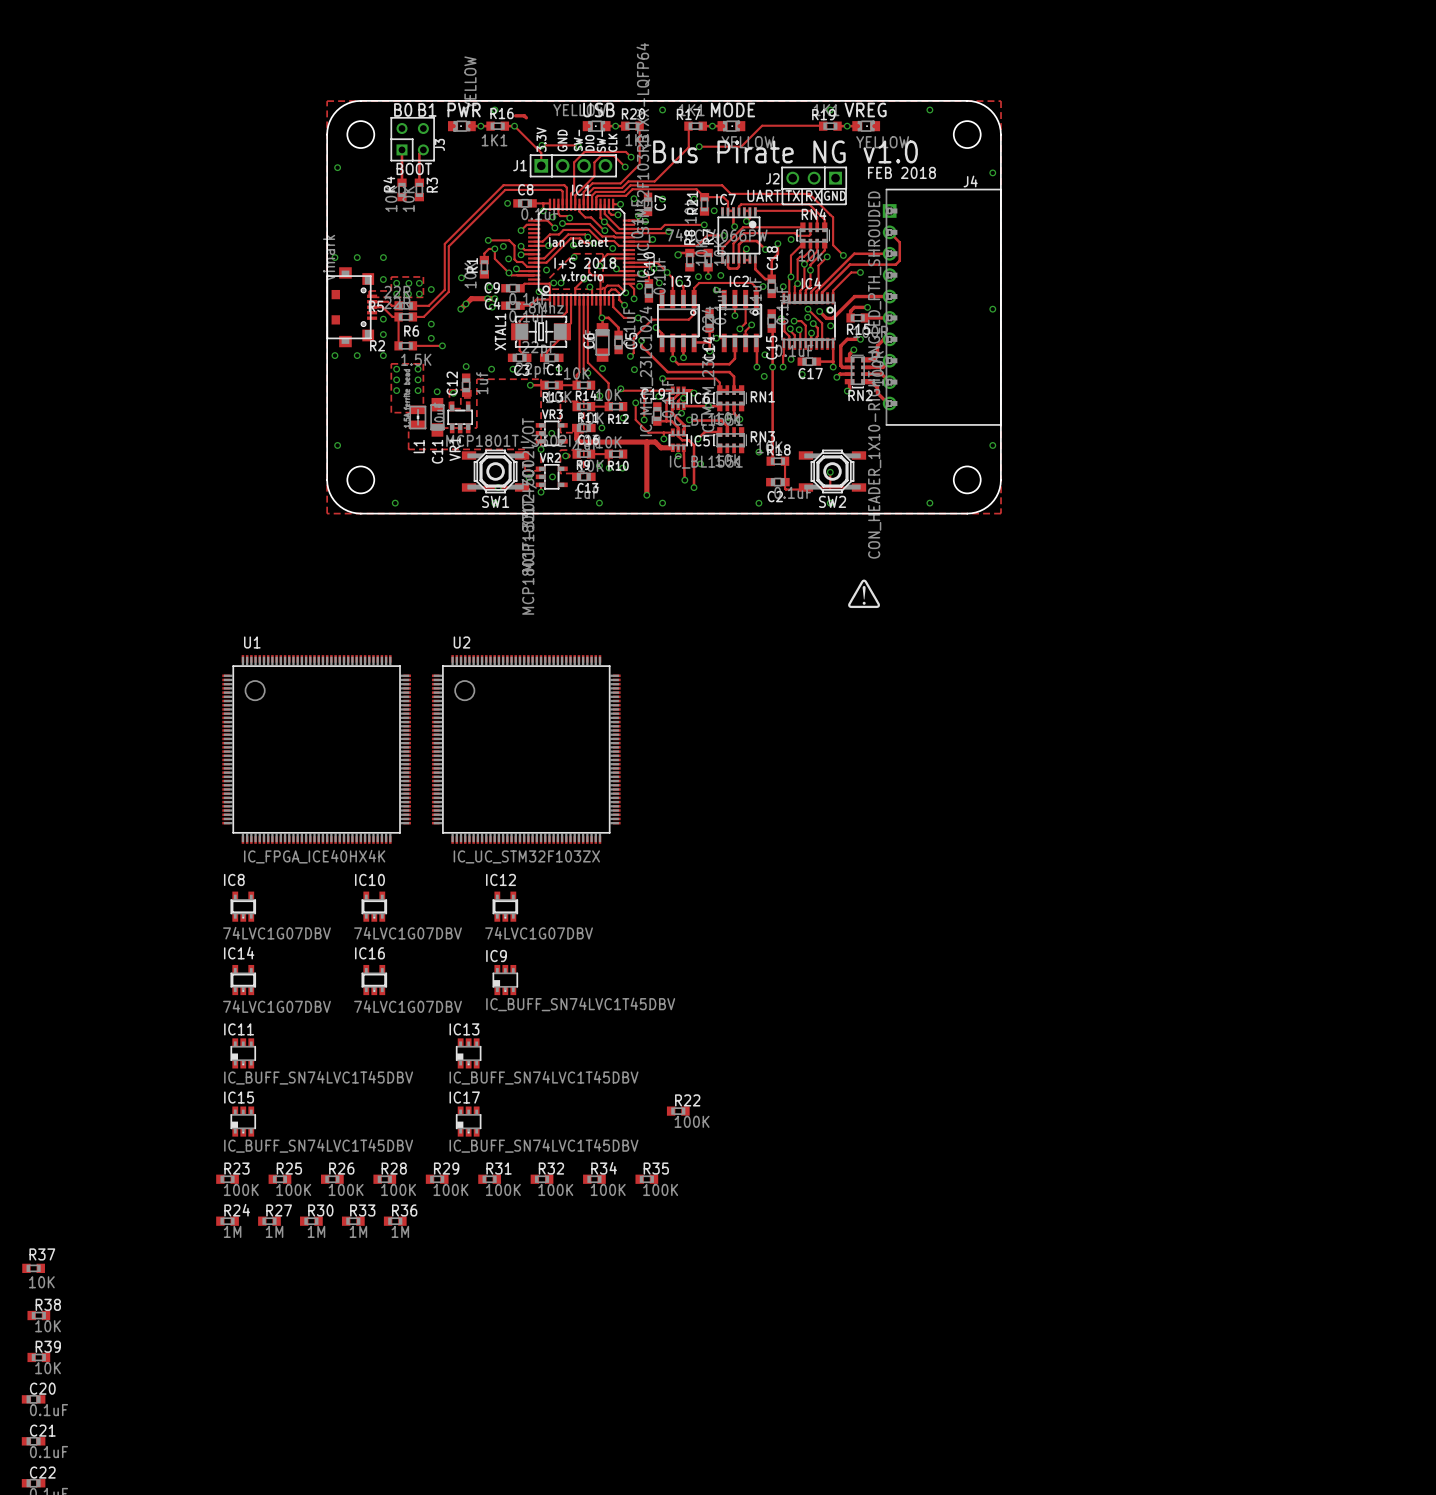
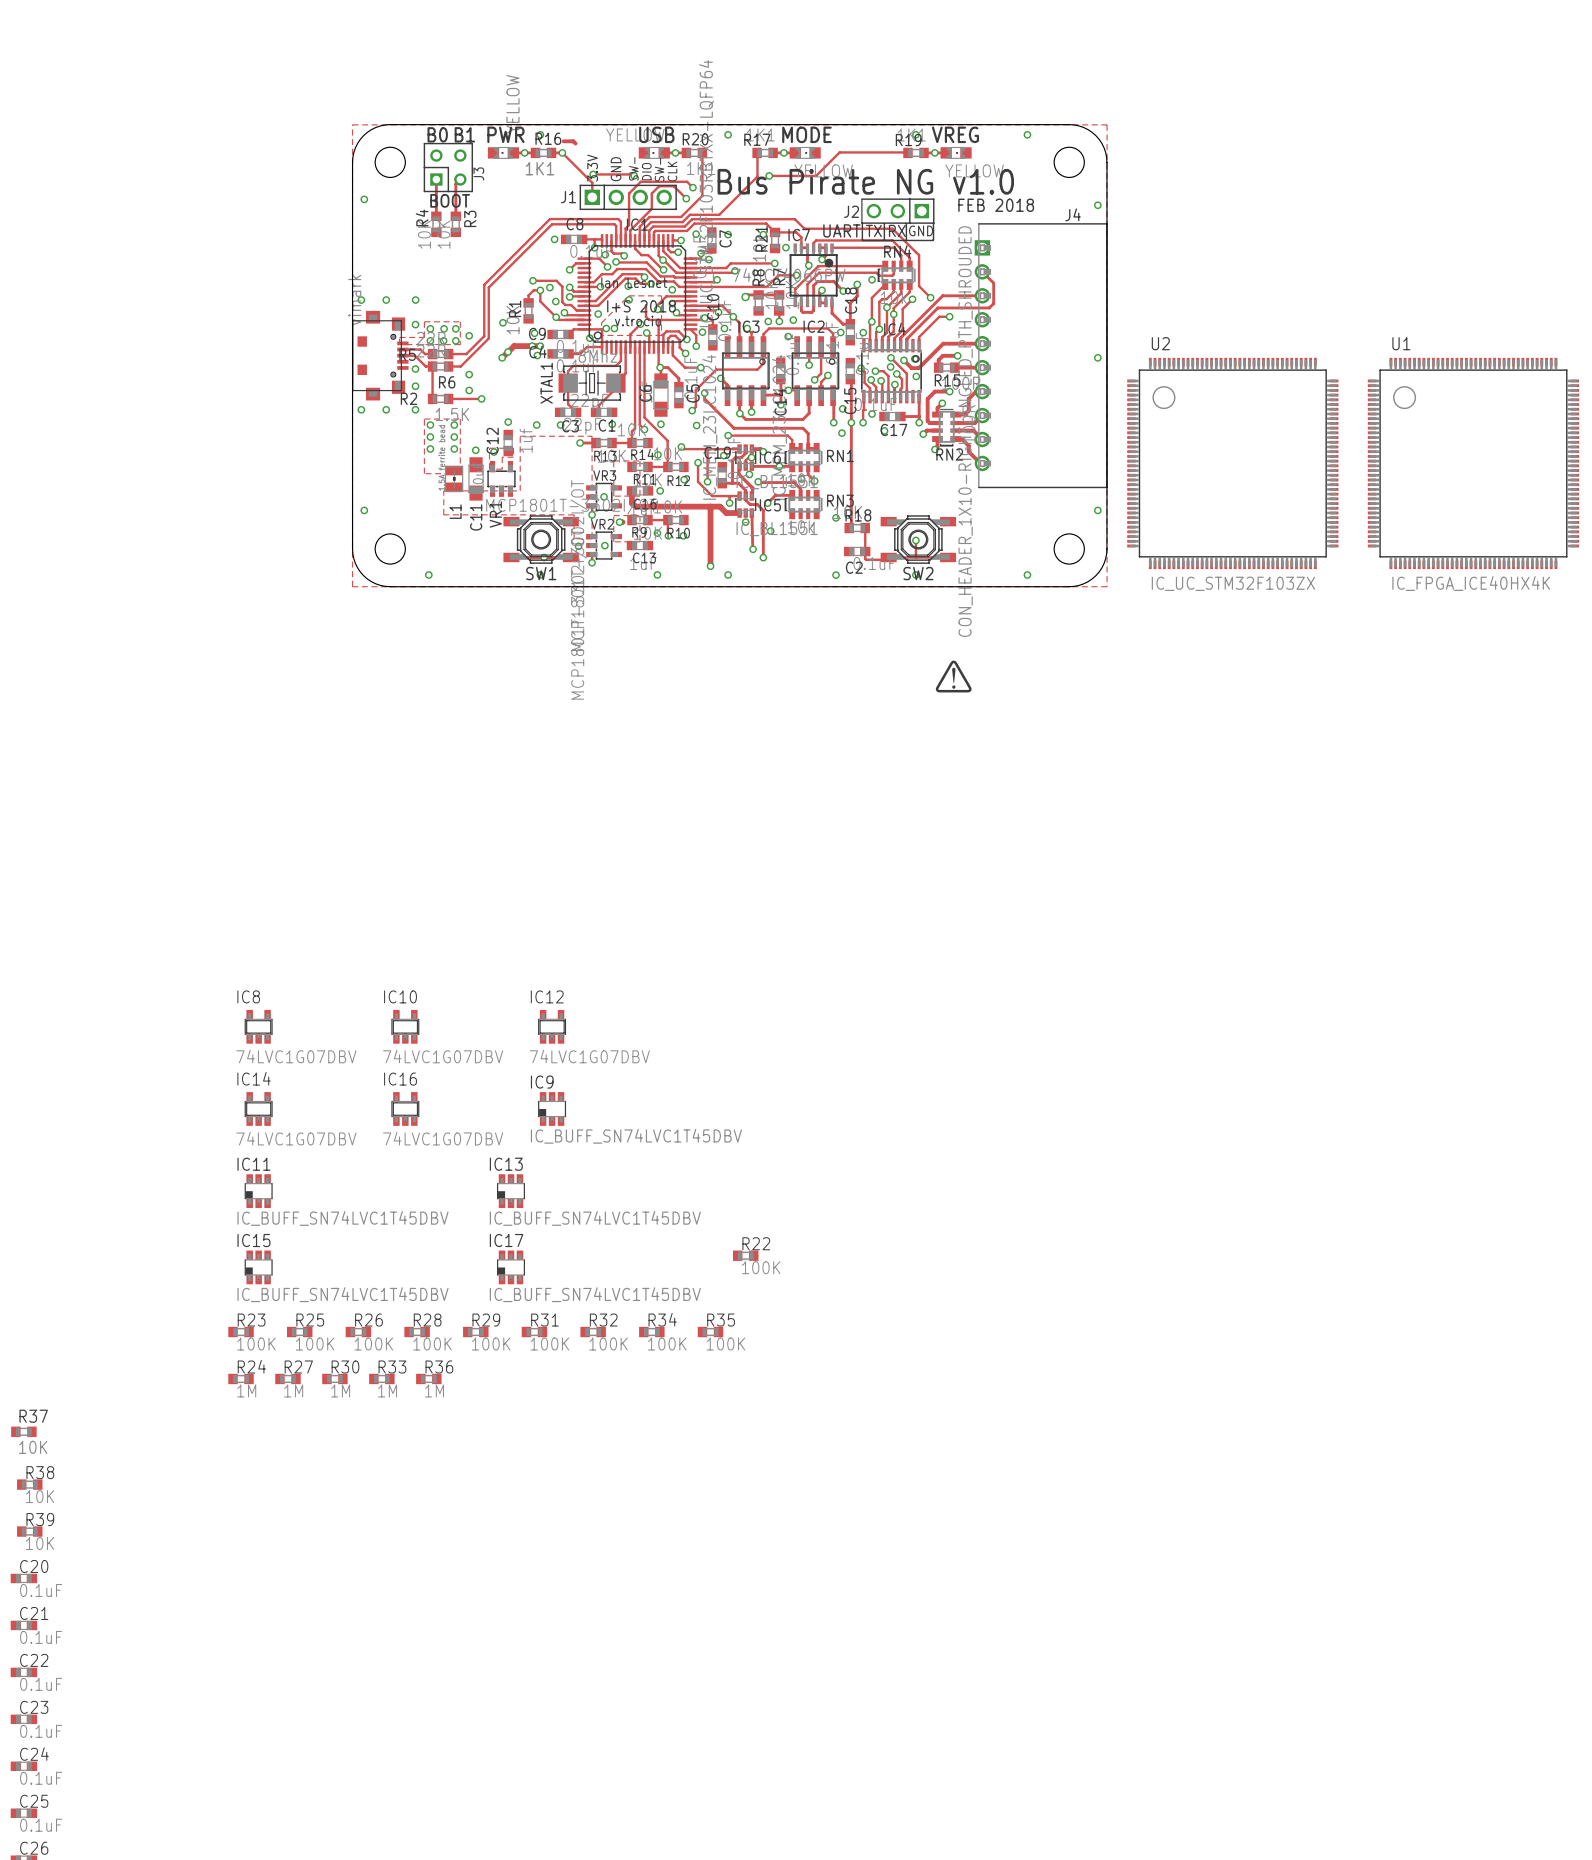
U1 position: (316, 749) -> (1473, 463)
U2 position: (526, 749) -> (1232, 463)

